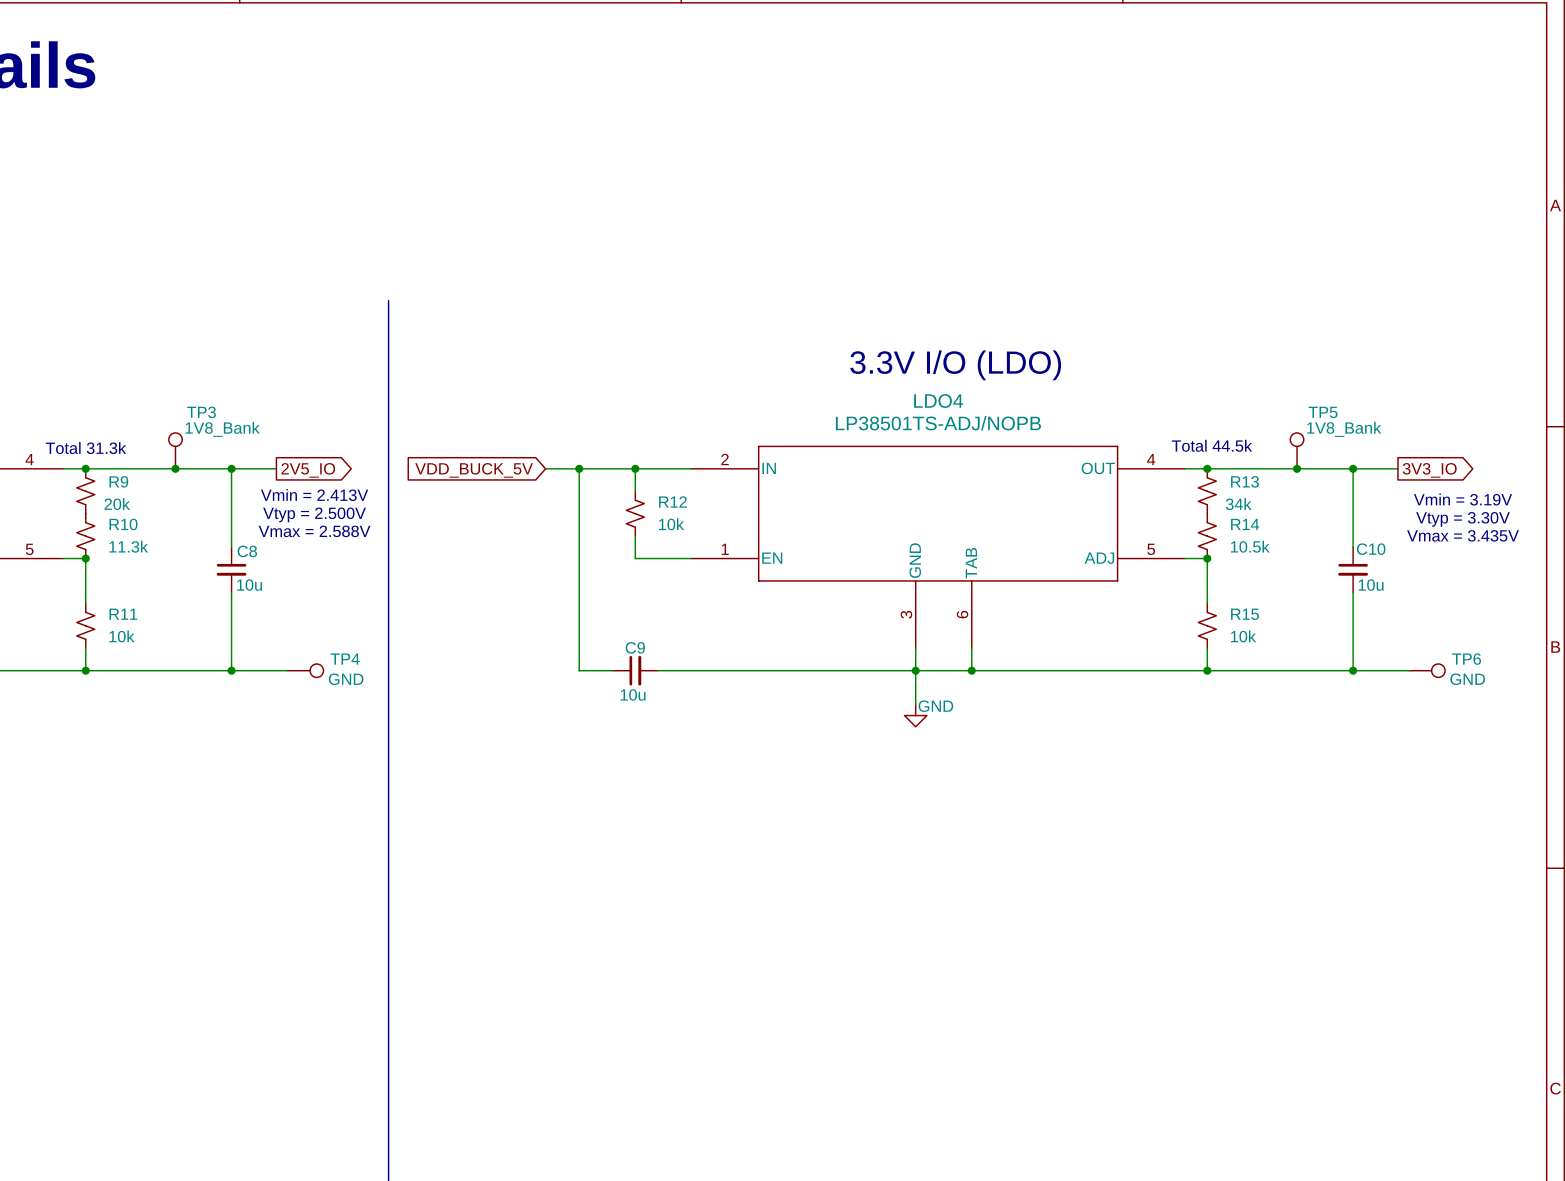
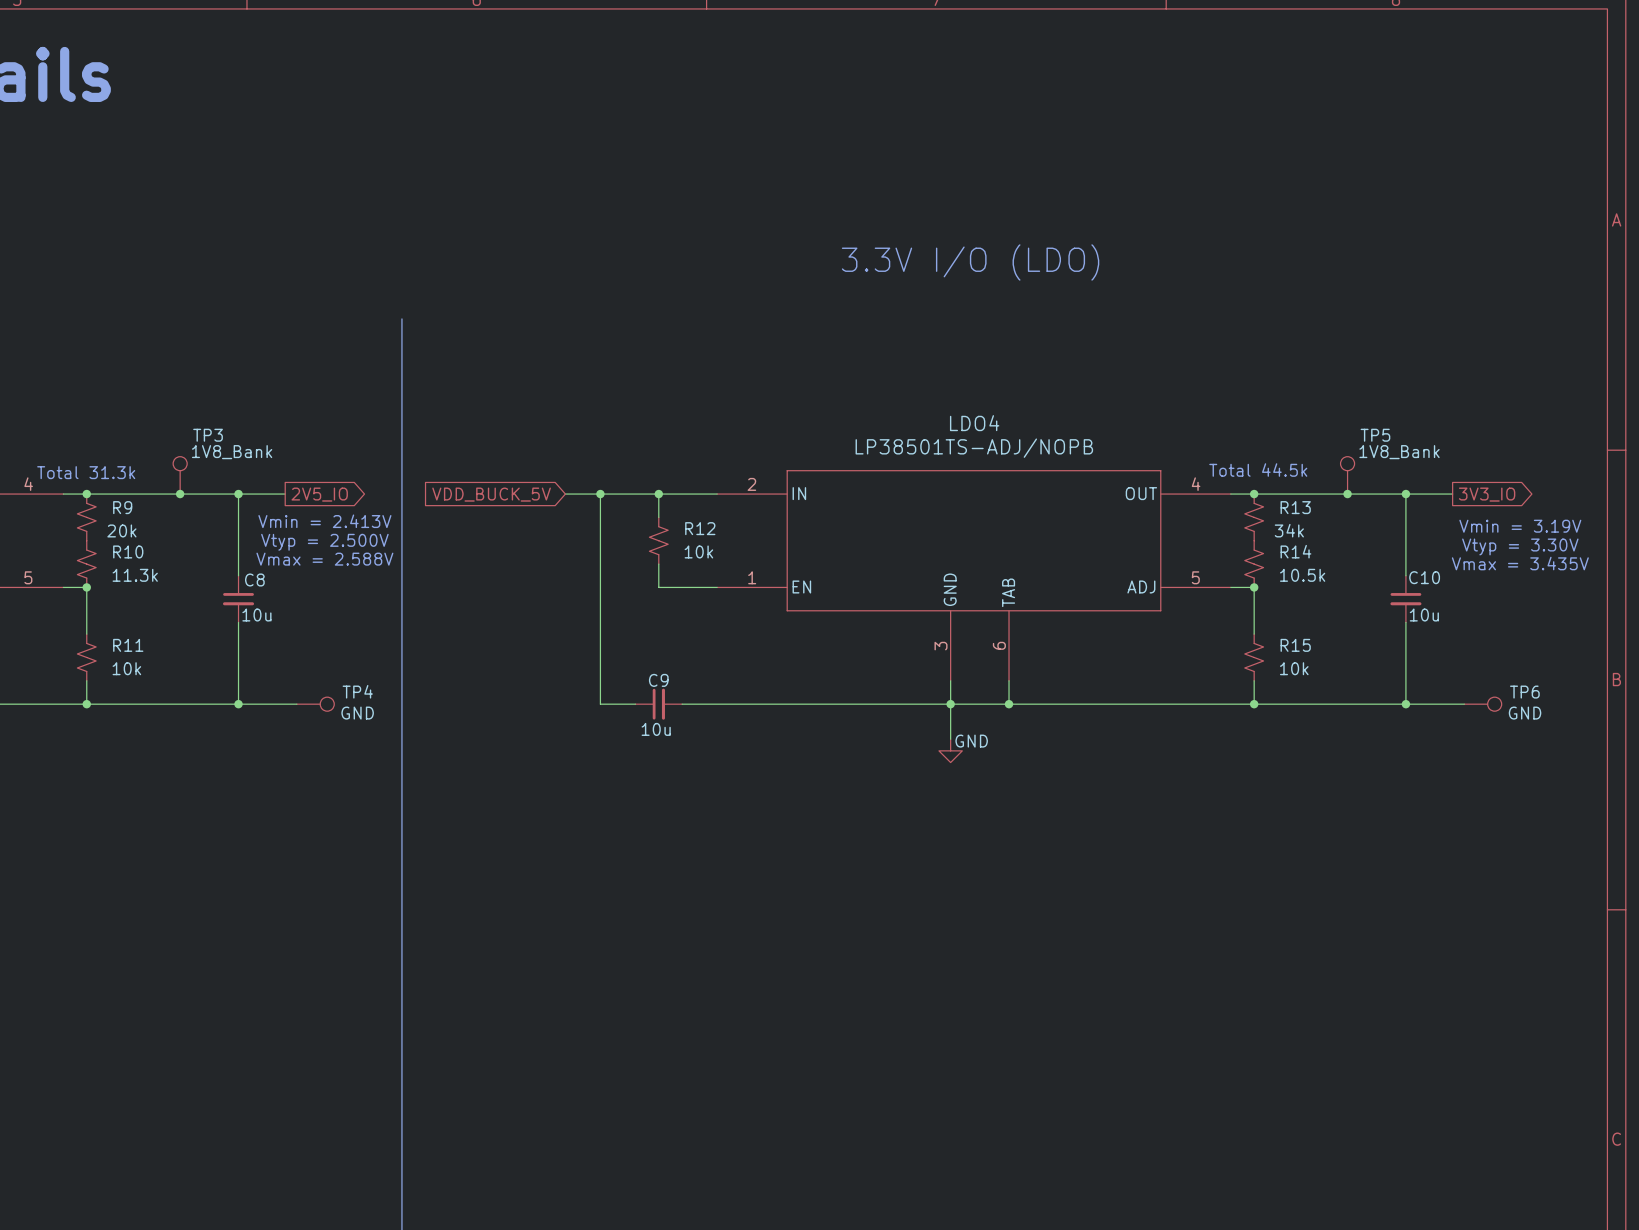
text position: 3.3V I/O (LDO) (955, 365) -> 3.3V I/O (LDO) (970, 262)

